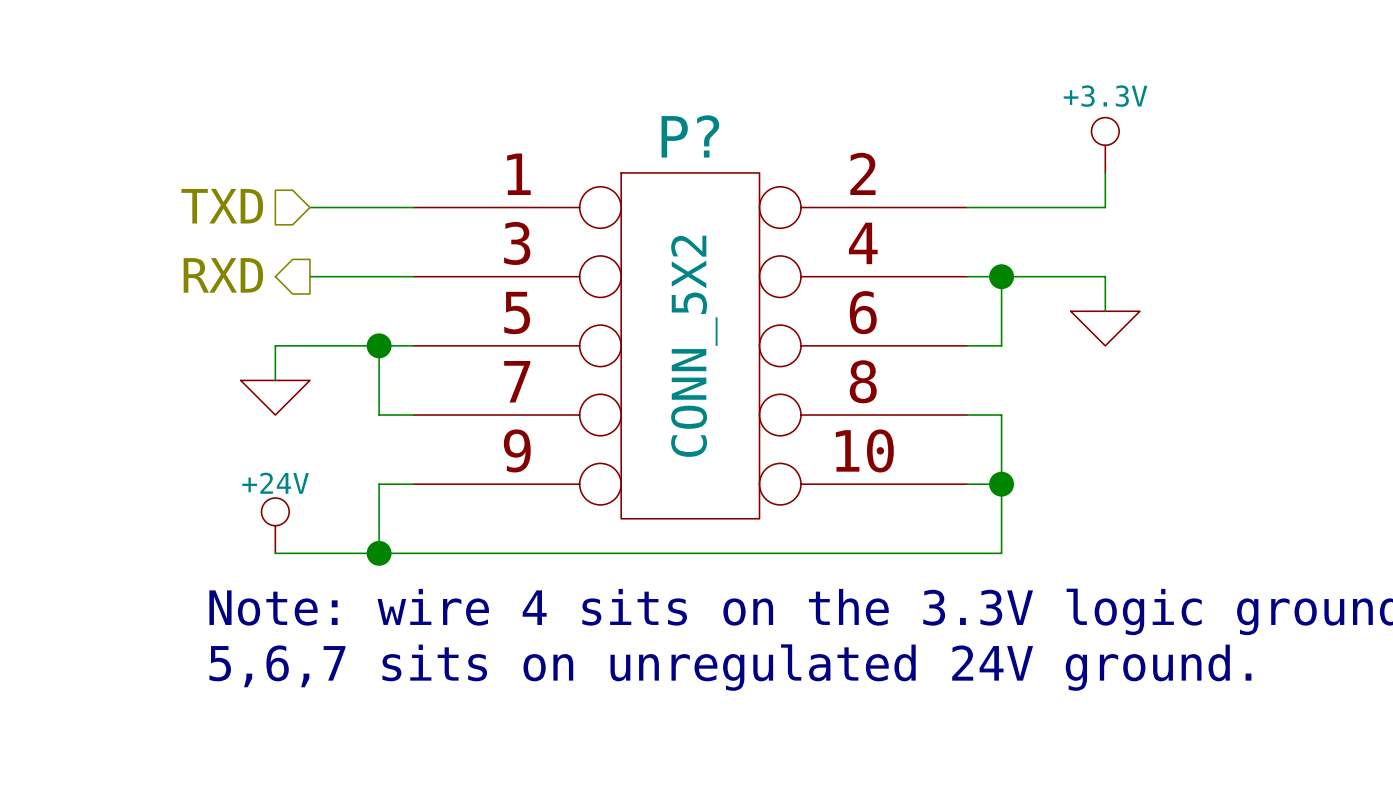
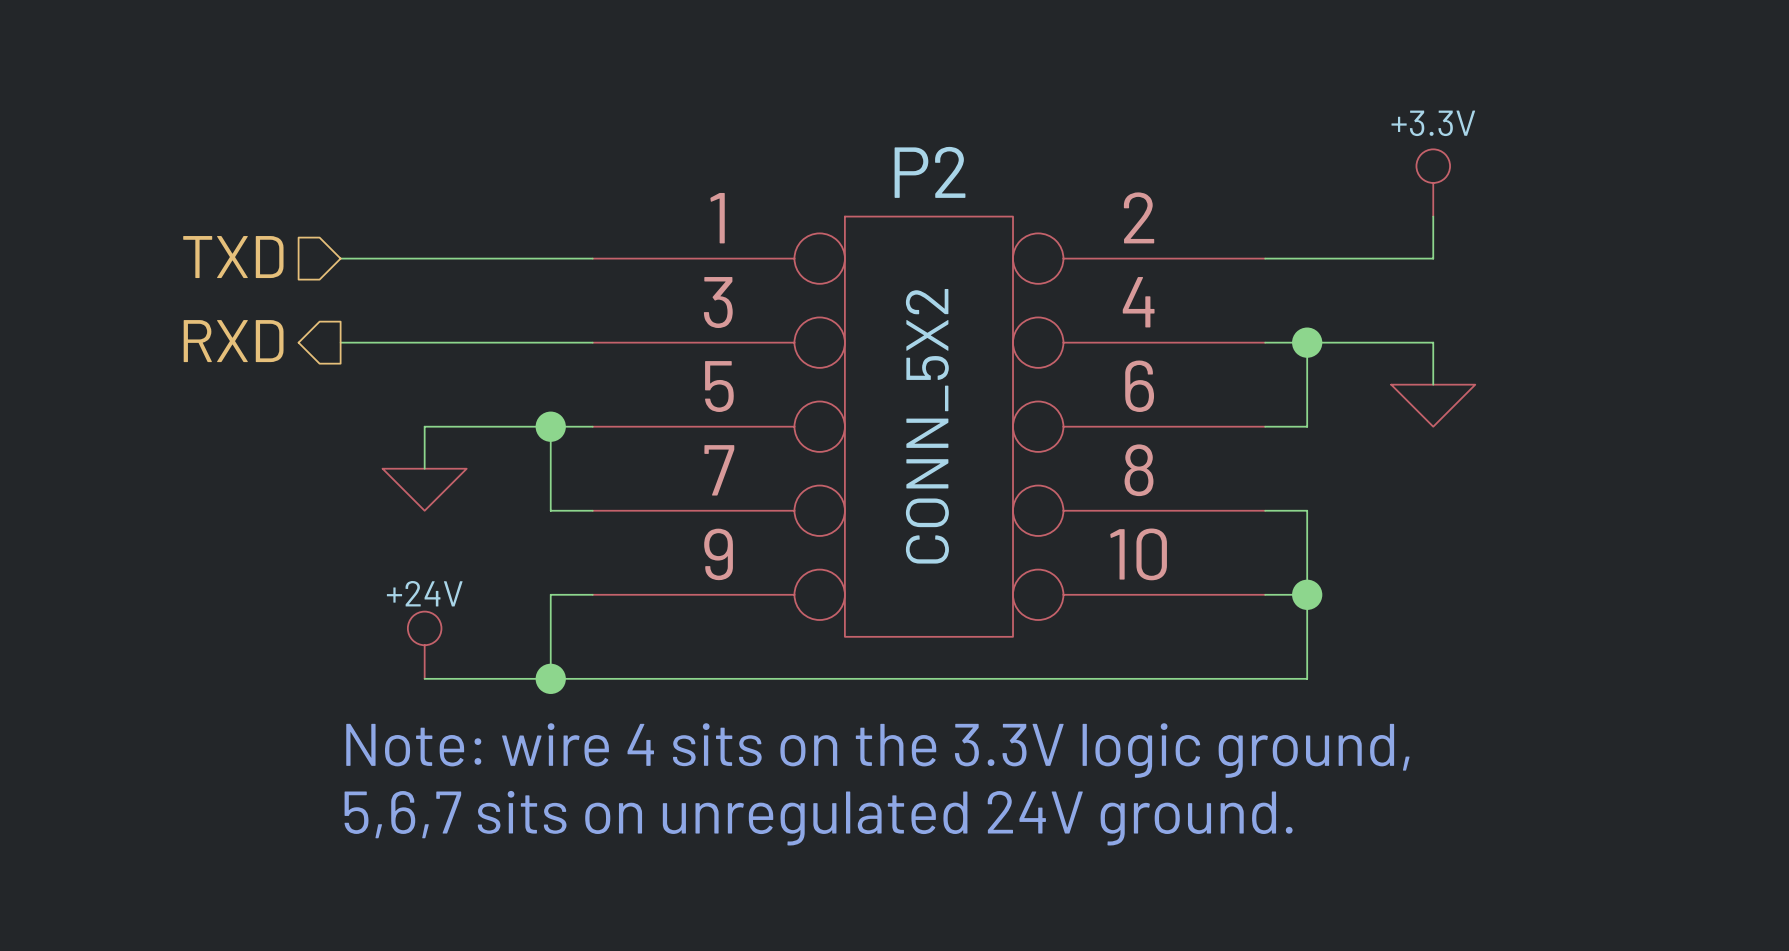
P? name: P? (690, 136) -> P2 (930, 172)
hierarchical label position: TXD (222, 206) -> TXD (233, 257)
wire: none -> (340, 258) (466, 258)
hierarchical label position: RXD (223, 275) -> RXD (233, 341)
wire: none -> (340, 342) (466, 342)

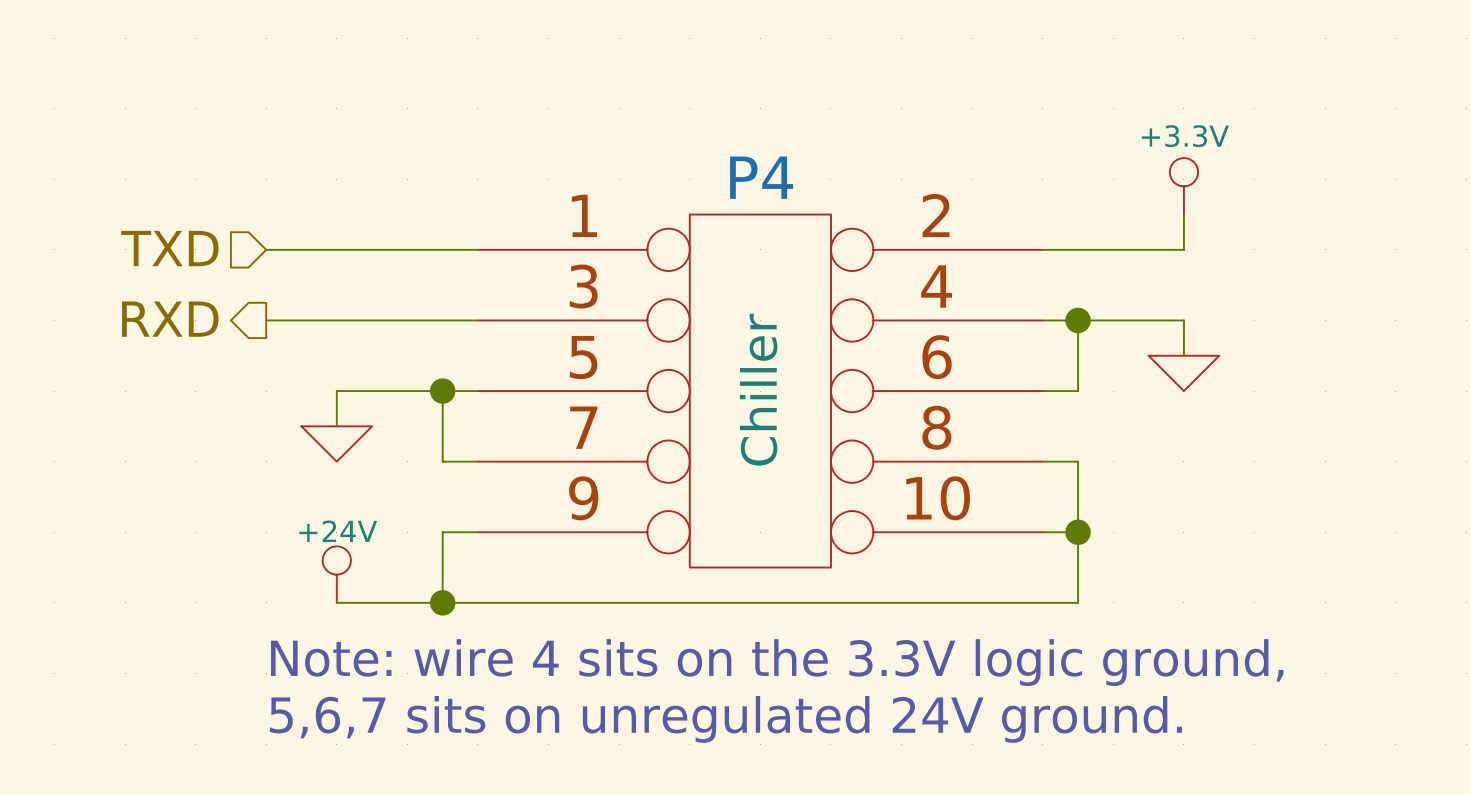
P2 name: P2 (930, 172) -> P4 (761, 177)
P2 value: CONN_5X2 (927, 426) -> Chiller (758, 389)

